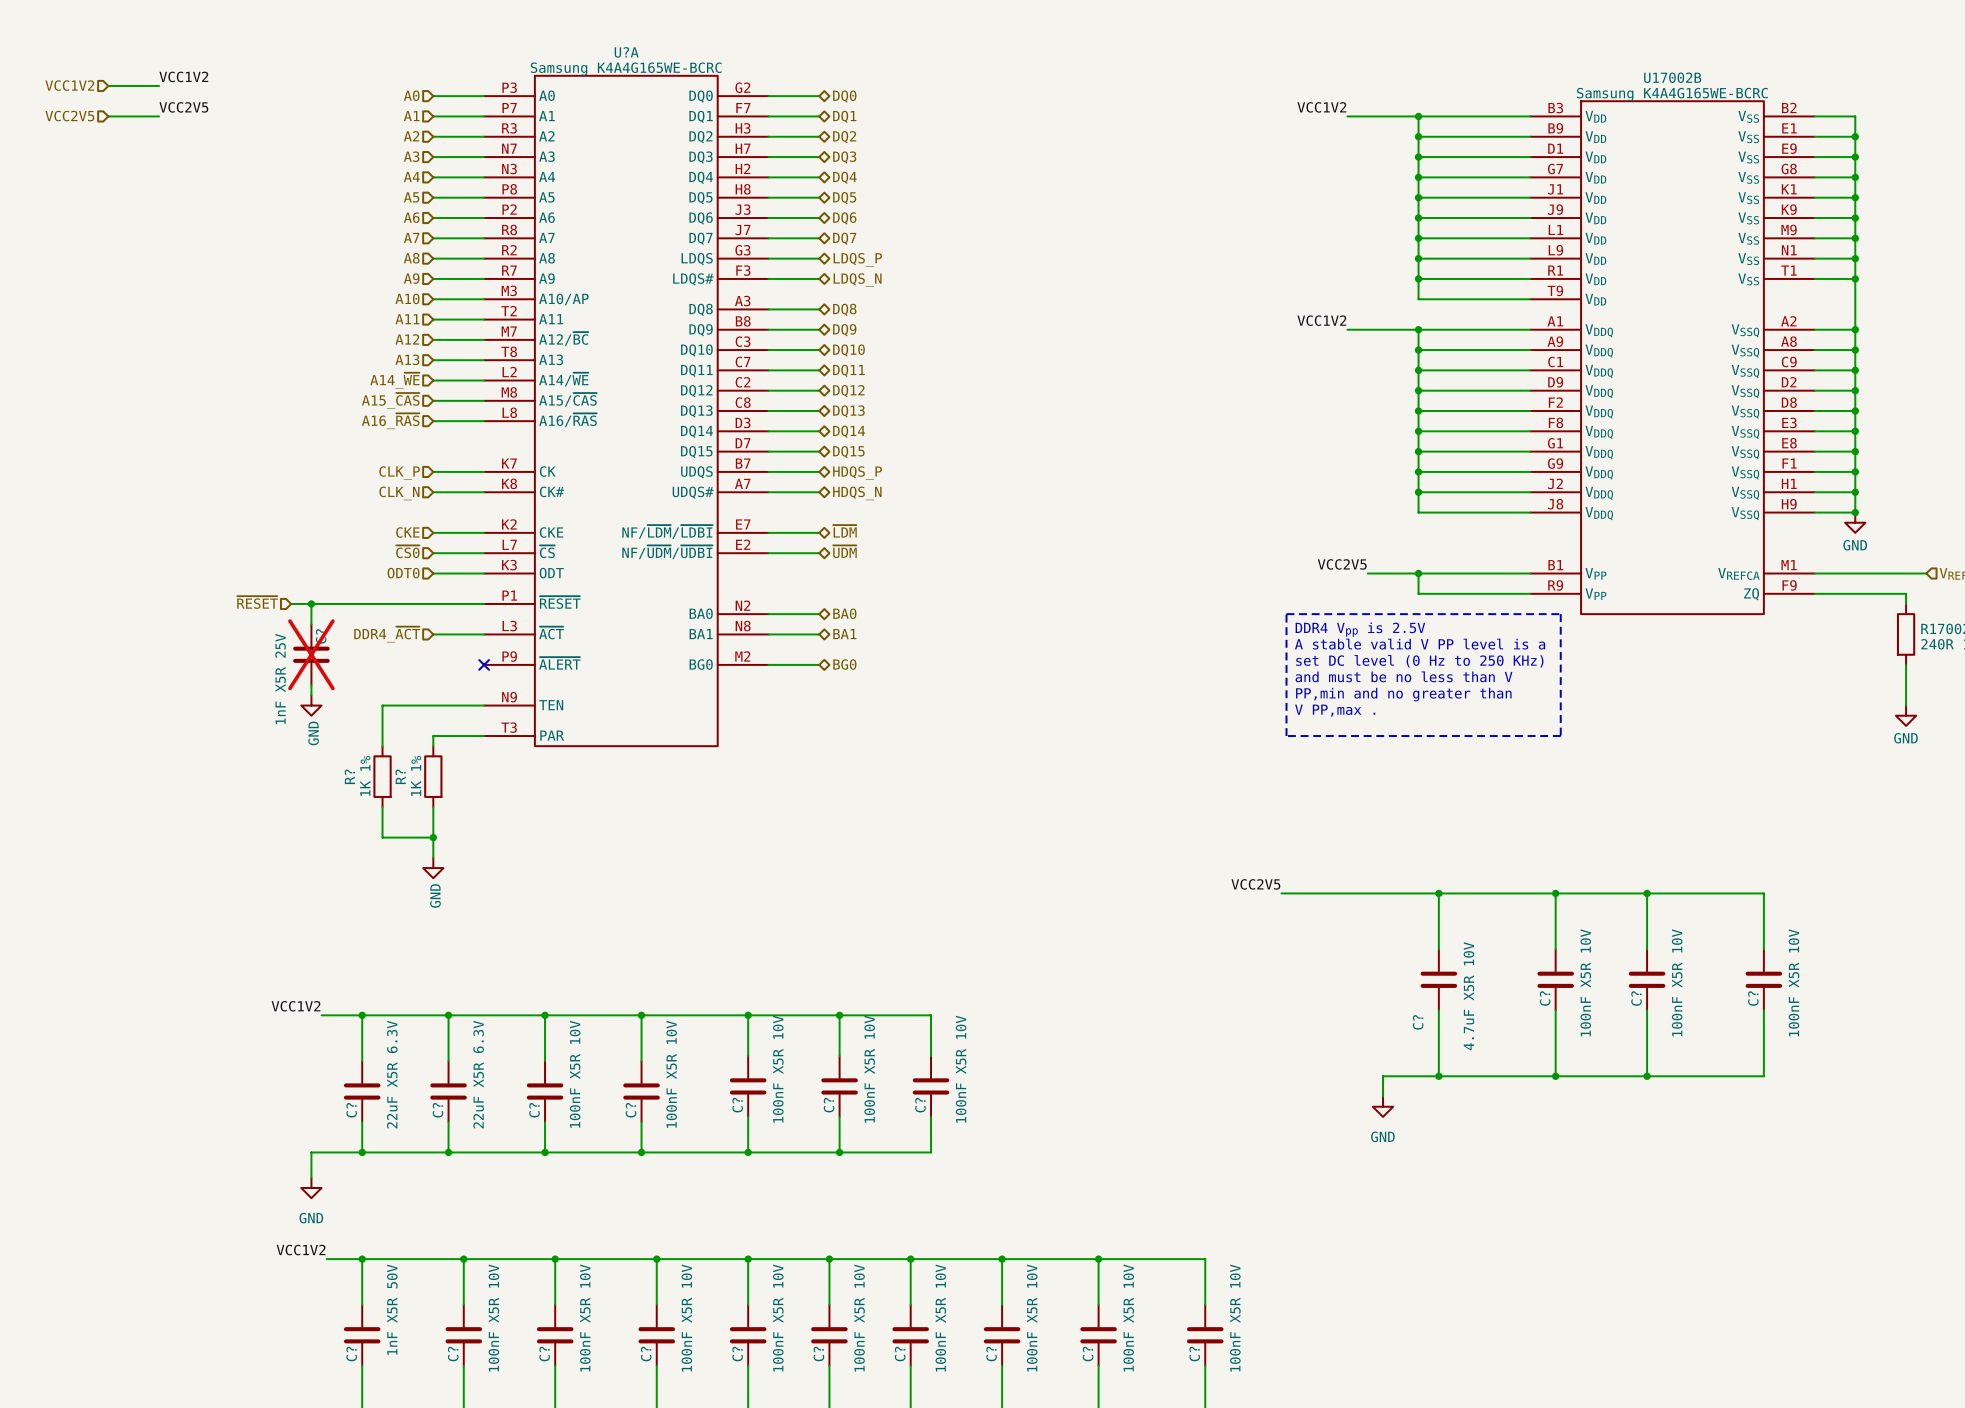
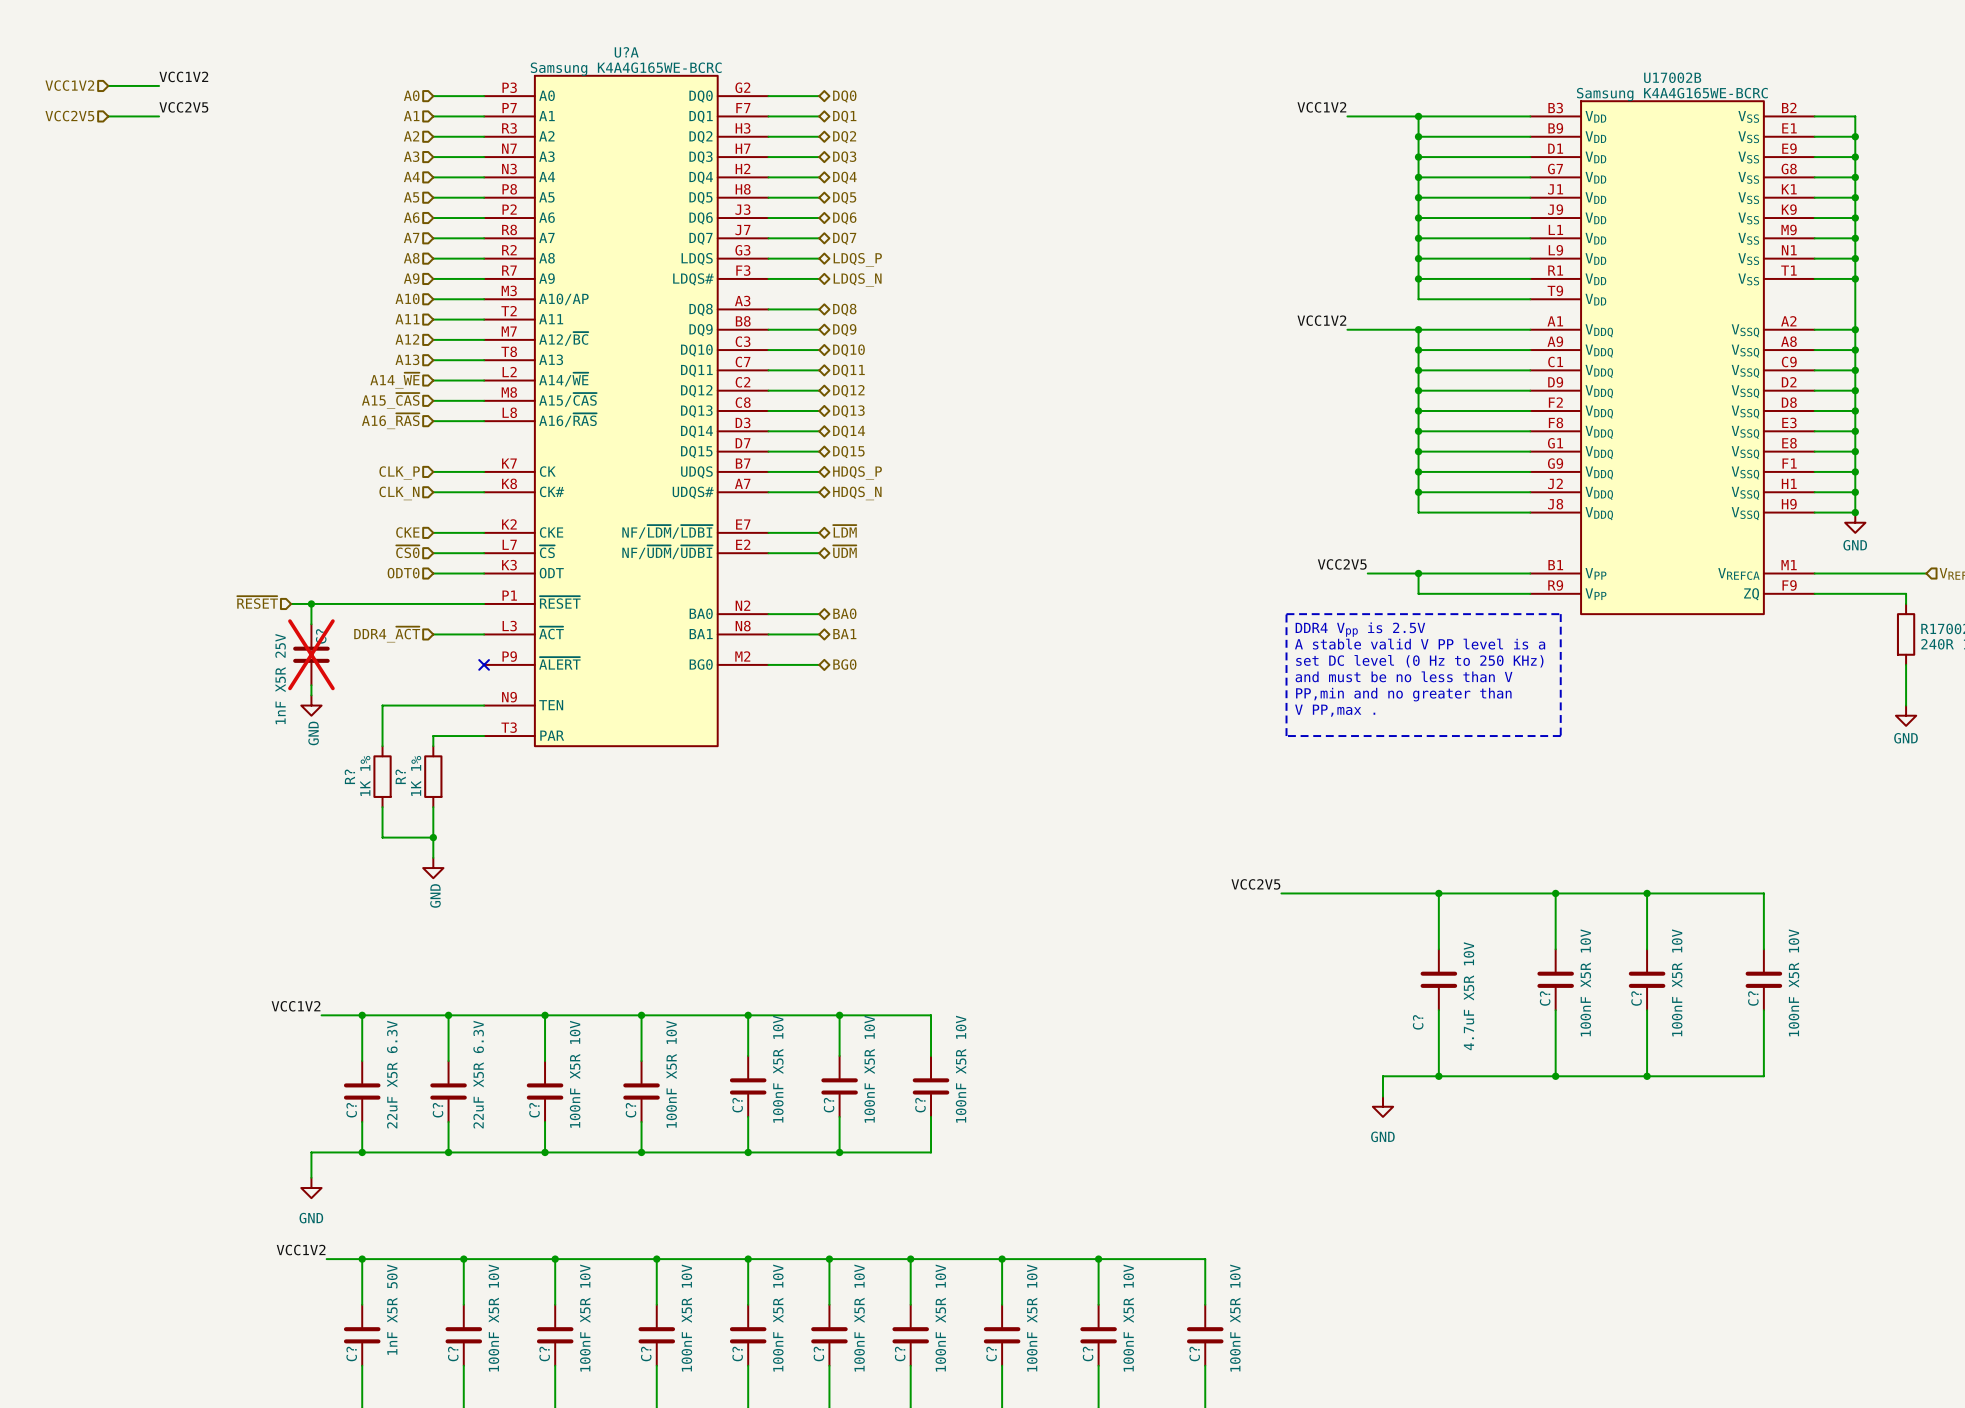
U?A symbol: [484, 75, 769, 747] -> [484, 75, 769, 747]
U17002B symbol: [1530, 101, 1815, 615] -> [1530, 101, 1815, 615]

